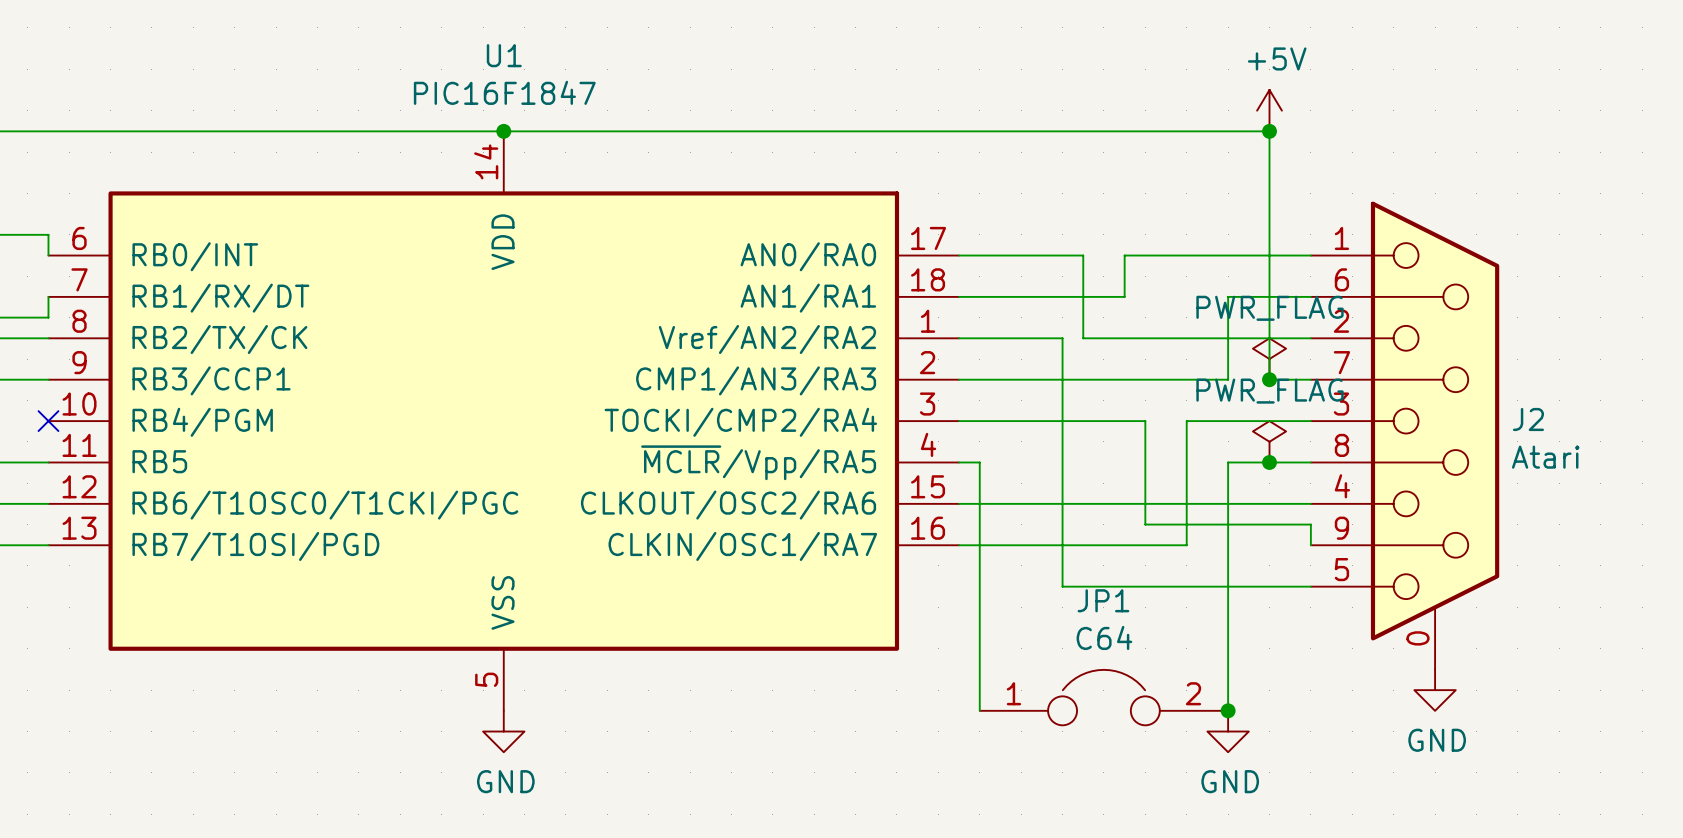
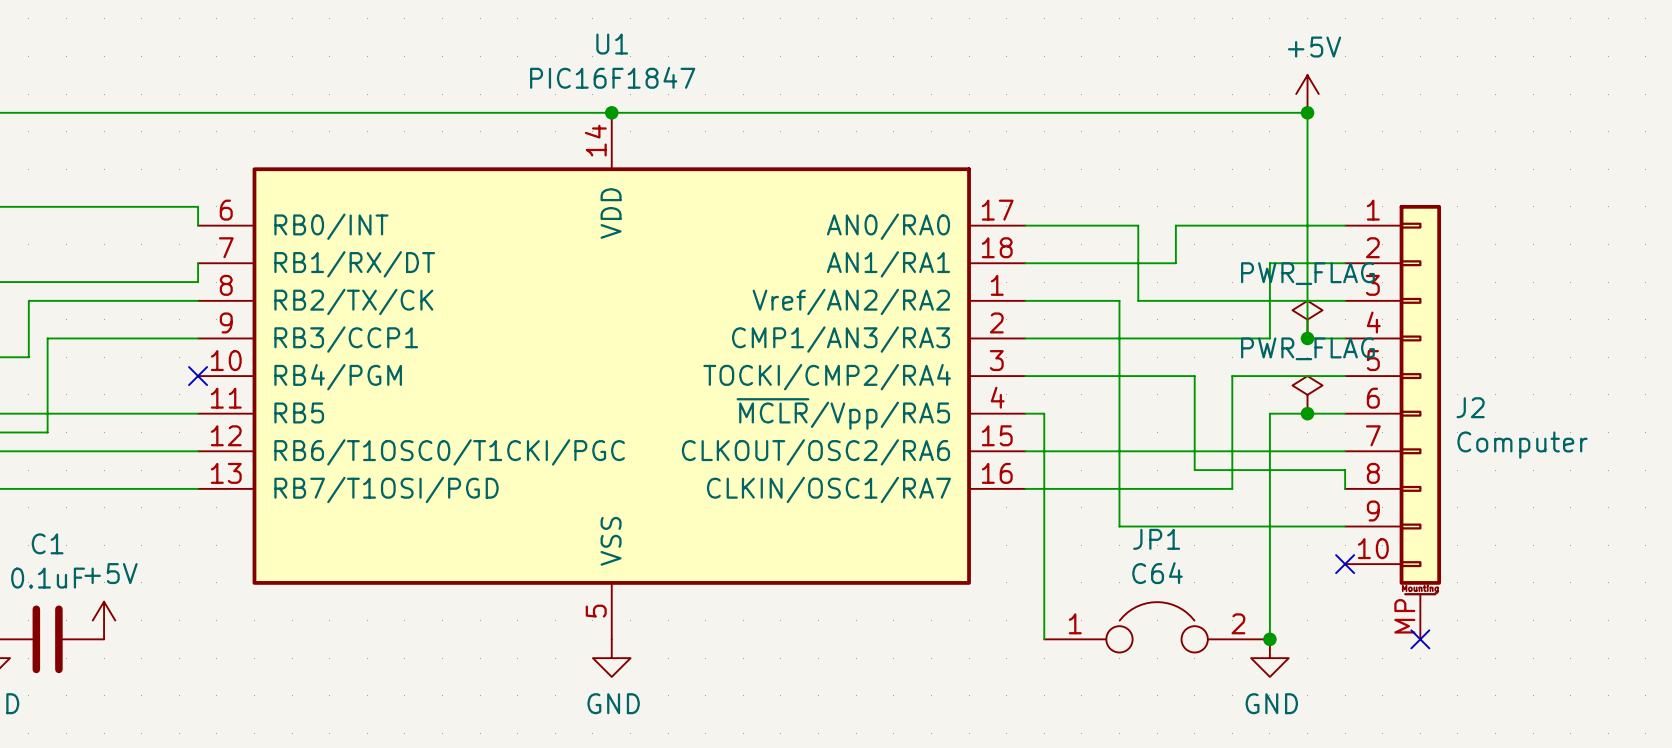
J2 symbol: [1310, 201, 1500, 670] -> [1345, 204, 1442, 640]
J2 name position: J2 (1528, 419) -> J2 (1470, 407)
J2 value: Atari (1545, 457) -> Computer (1522, 445)
no-connect mark: none -> (1345, 564)
power symbol: GND (1435, 690) -> none
no-connect mark: none -> (1420, 639)

